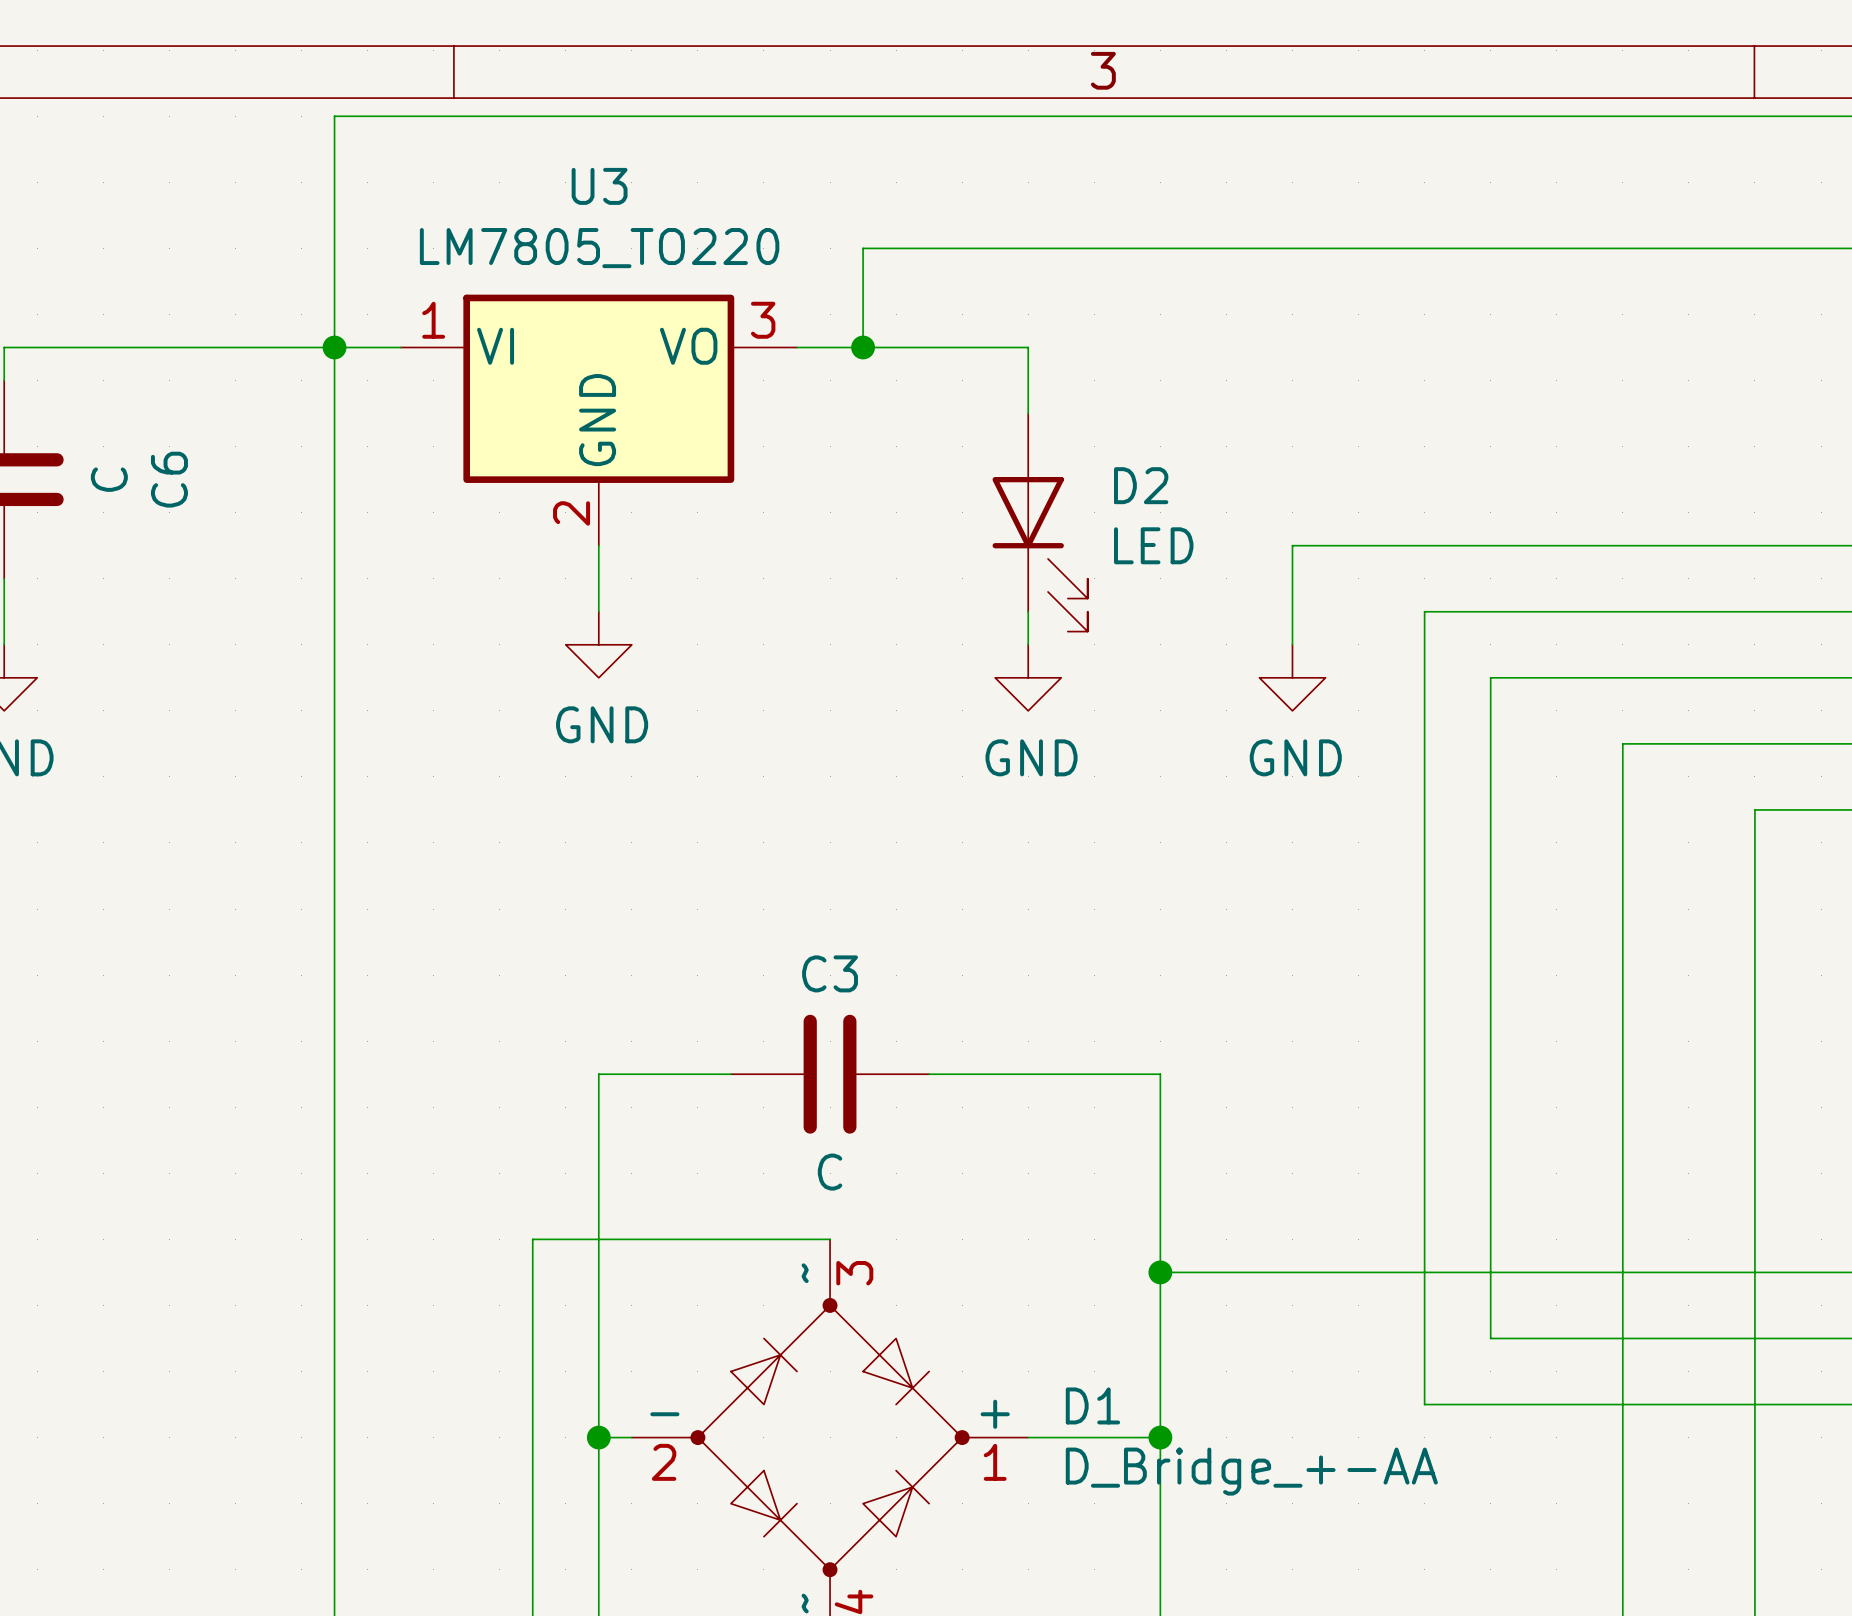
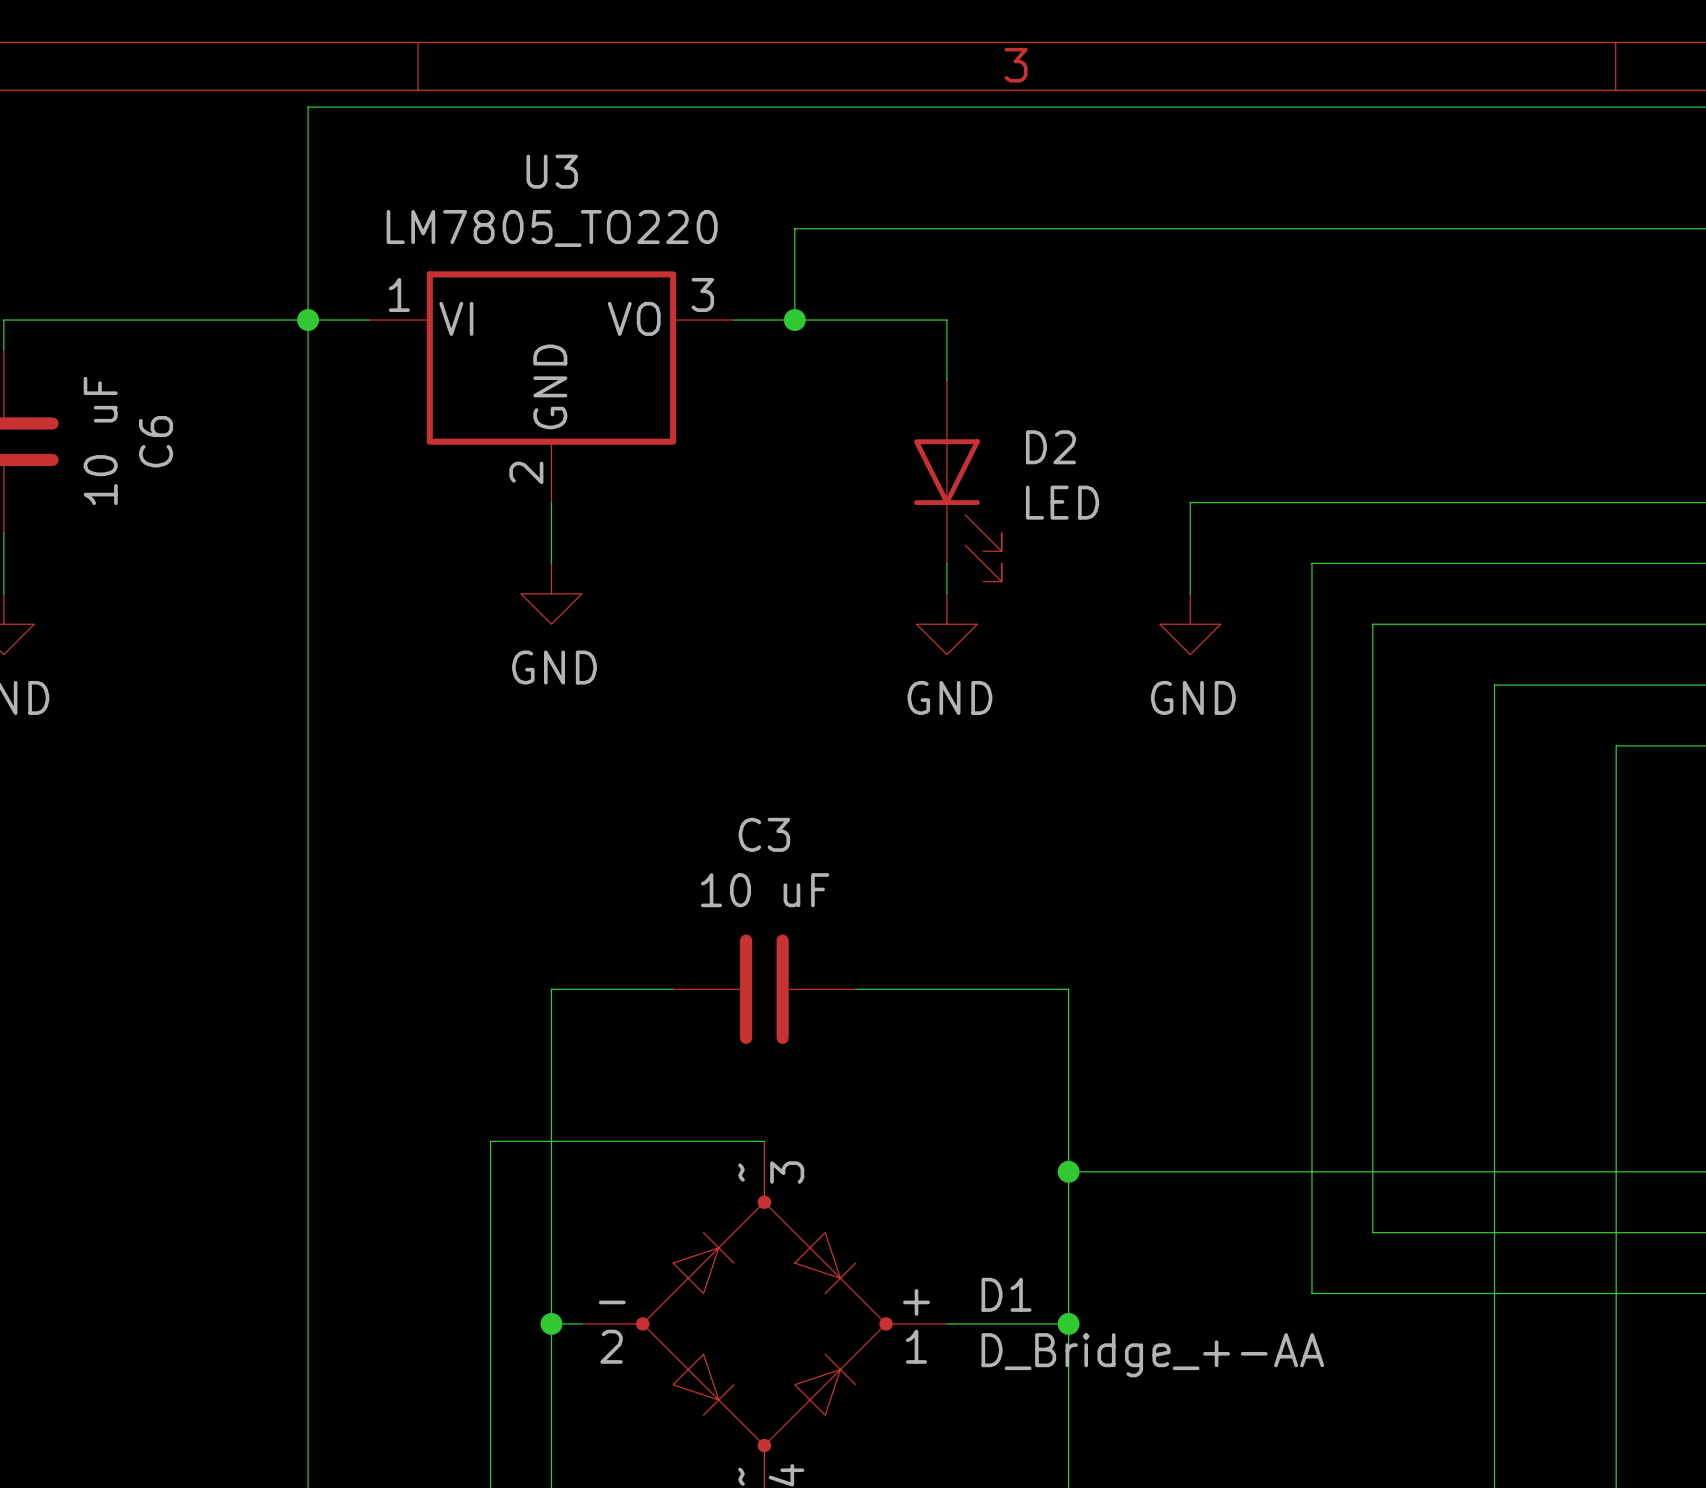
C6 value: C (109, 479) -> 10 uF (100, 440)
C3 name position: C3 (830, 973) -> C3 (764, 834)
C3 value: C (830, 1172) -> 10 uF (765, 890)

